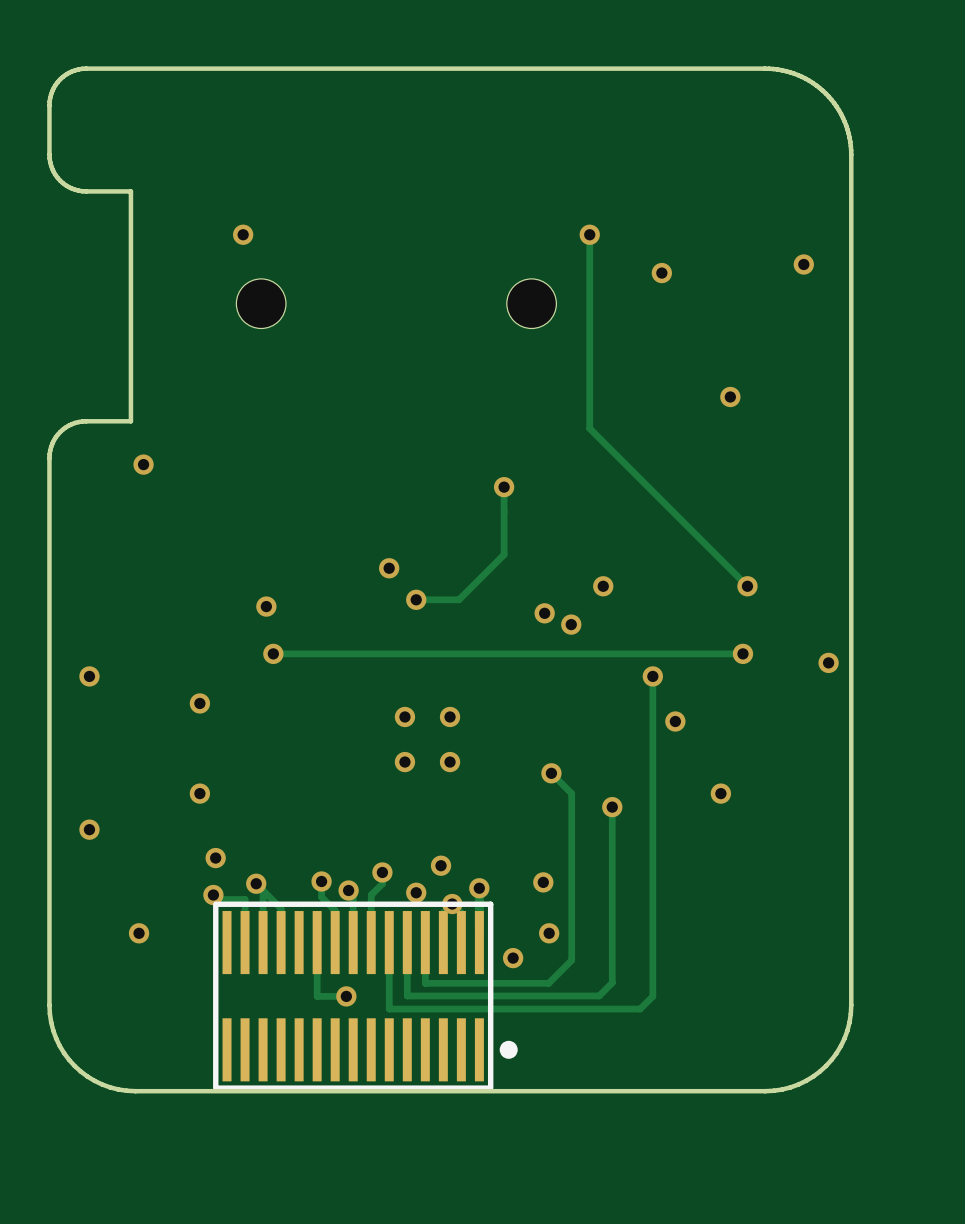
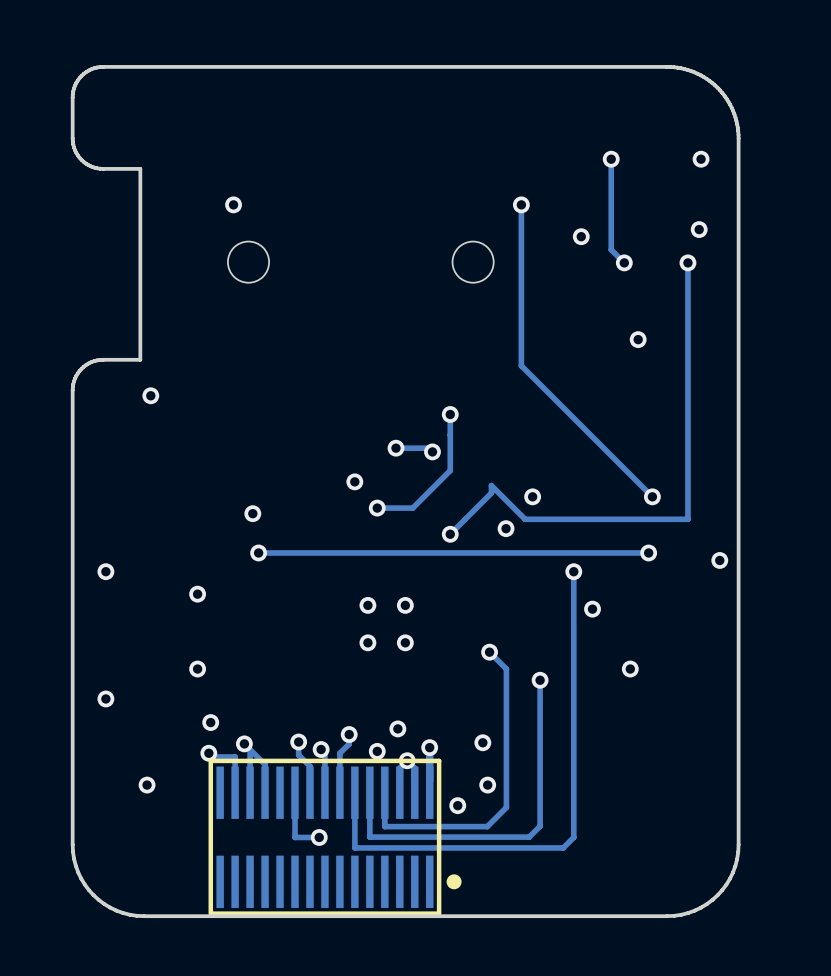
track: none -> (611, 159) (611, 249) (624, 262)
via: none -> (611, 159)
via: none -> (701, 159)
via: none -> (624, 262)
track: none -> (687, 262) (687, 519) (525, 519) (491, 485) (491, 493) (450, 534)
via: none -> (687, 262)
track: none -> (395, 448) (428, 448) (432, 451)
via: none -> (395, 448)
via: none -> (432, 451)
via position: (544, 613) -> (450, 534)

